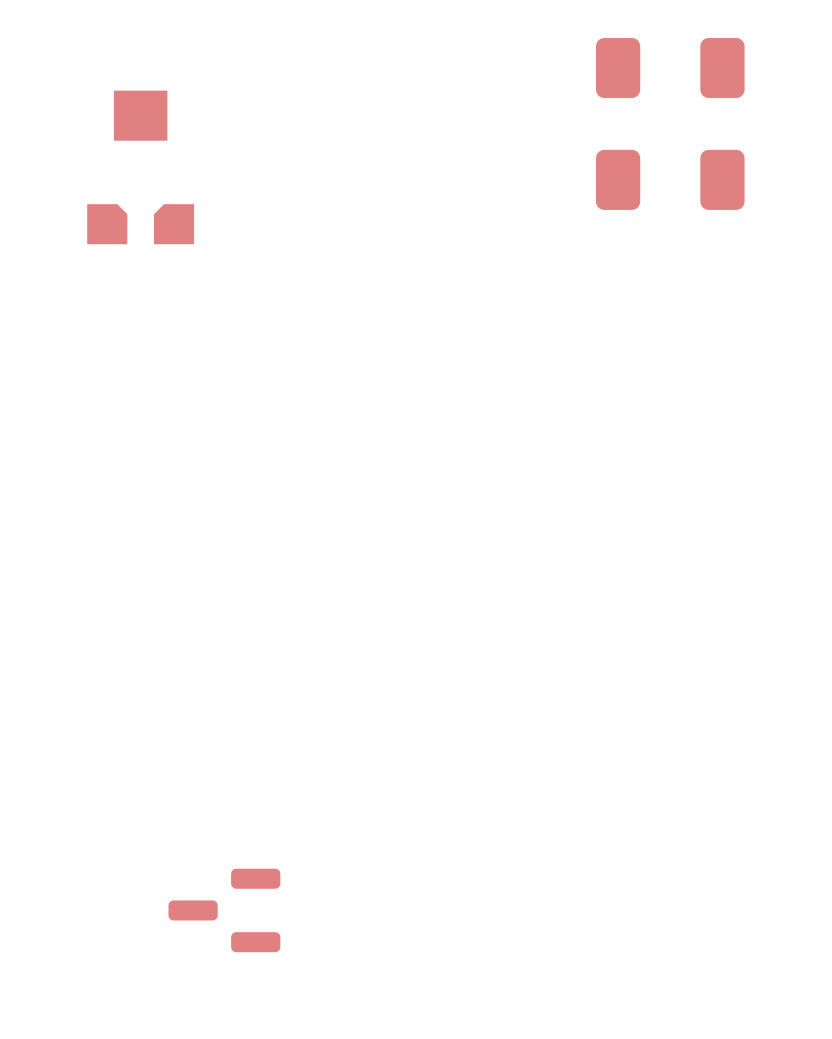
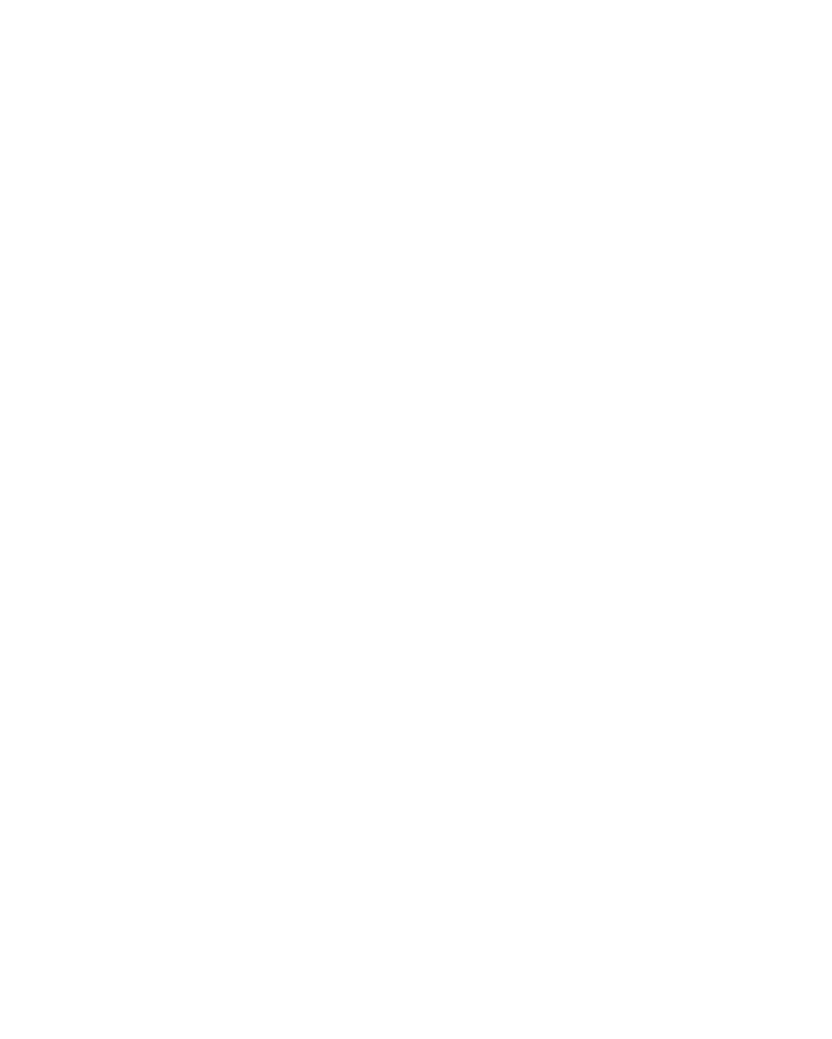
part: (670, 67) -> none
part: (140, 167) -> none
part: (670, 179) -> none
part: (224, 910) -> none

